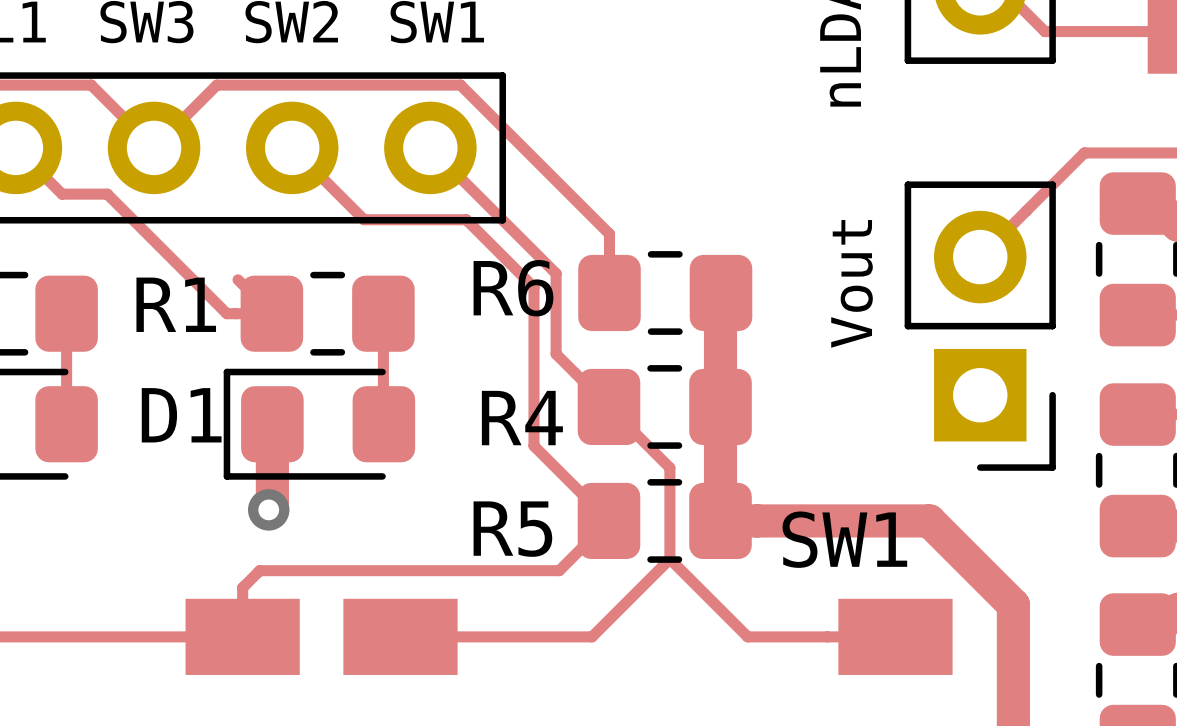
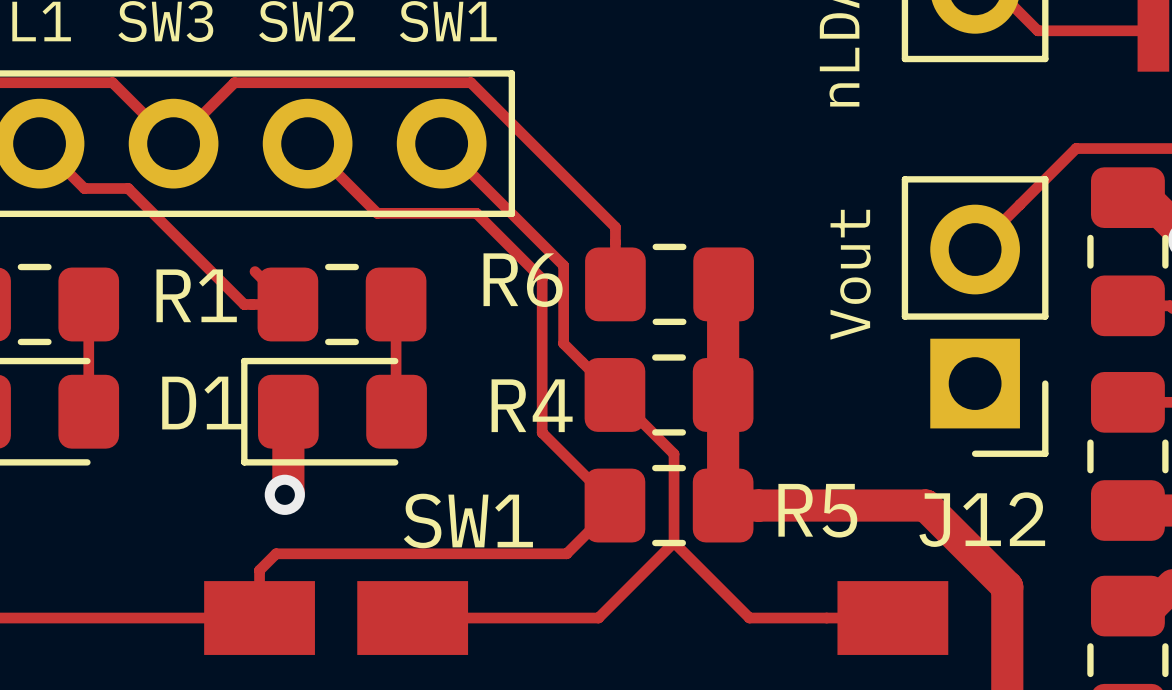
R5 name position: R5 (512, 529) -> R5 (817, 510)
J12 name: none -> J12 (982, 519)
SW1 name position: SW1 (844, 539) -> SW1 (468, 520)

